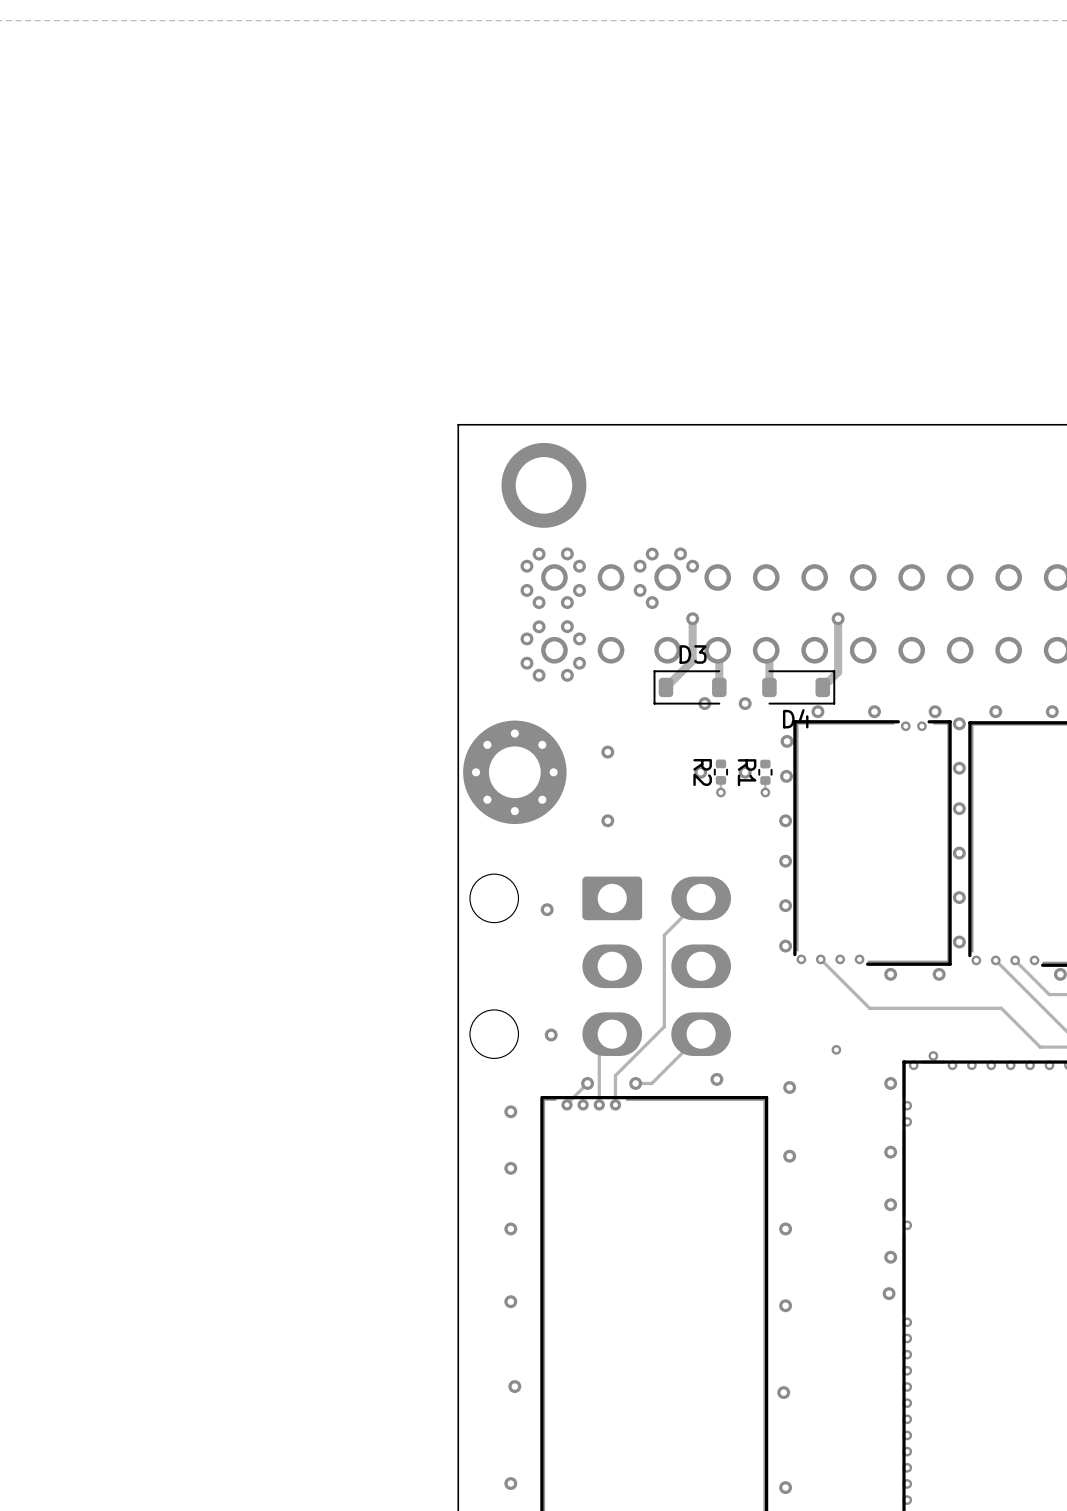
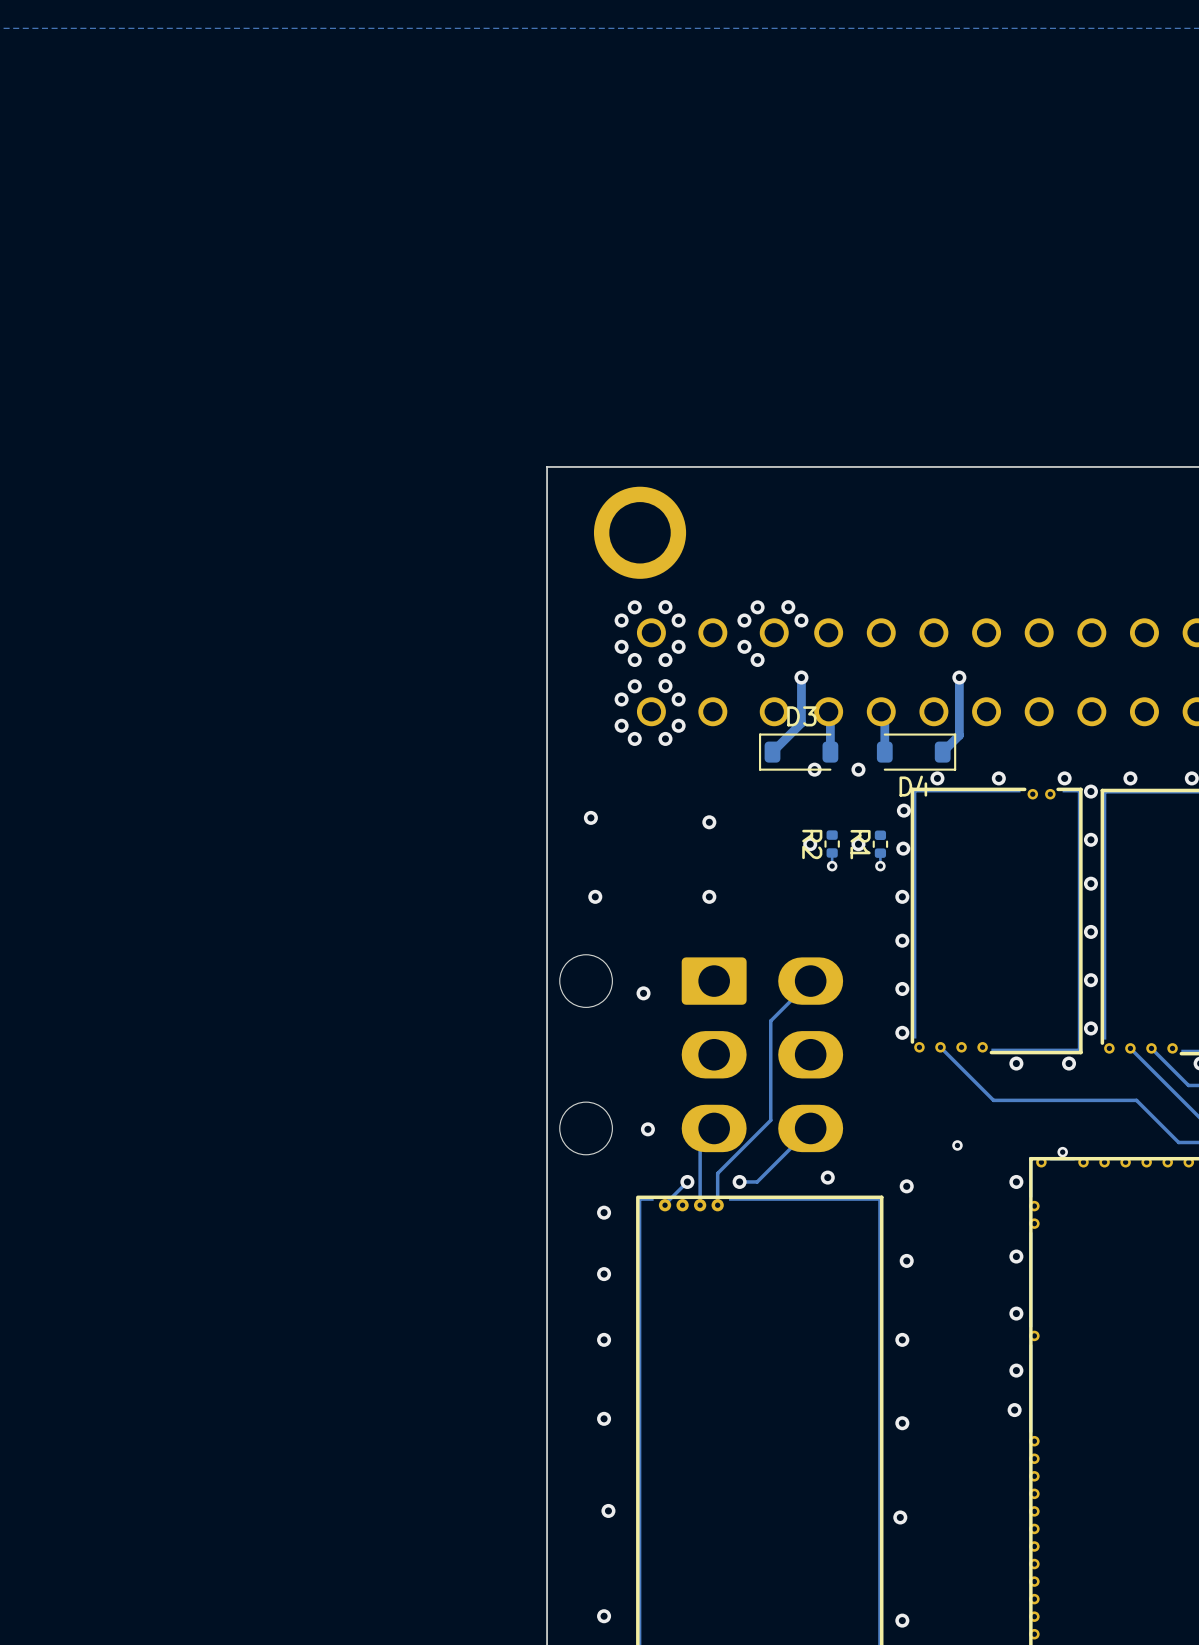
via: none -> (590, 817)
part: (514, 772) -> none
via: none -> (595, 896)

